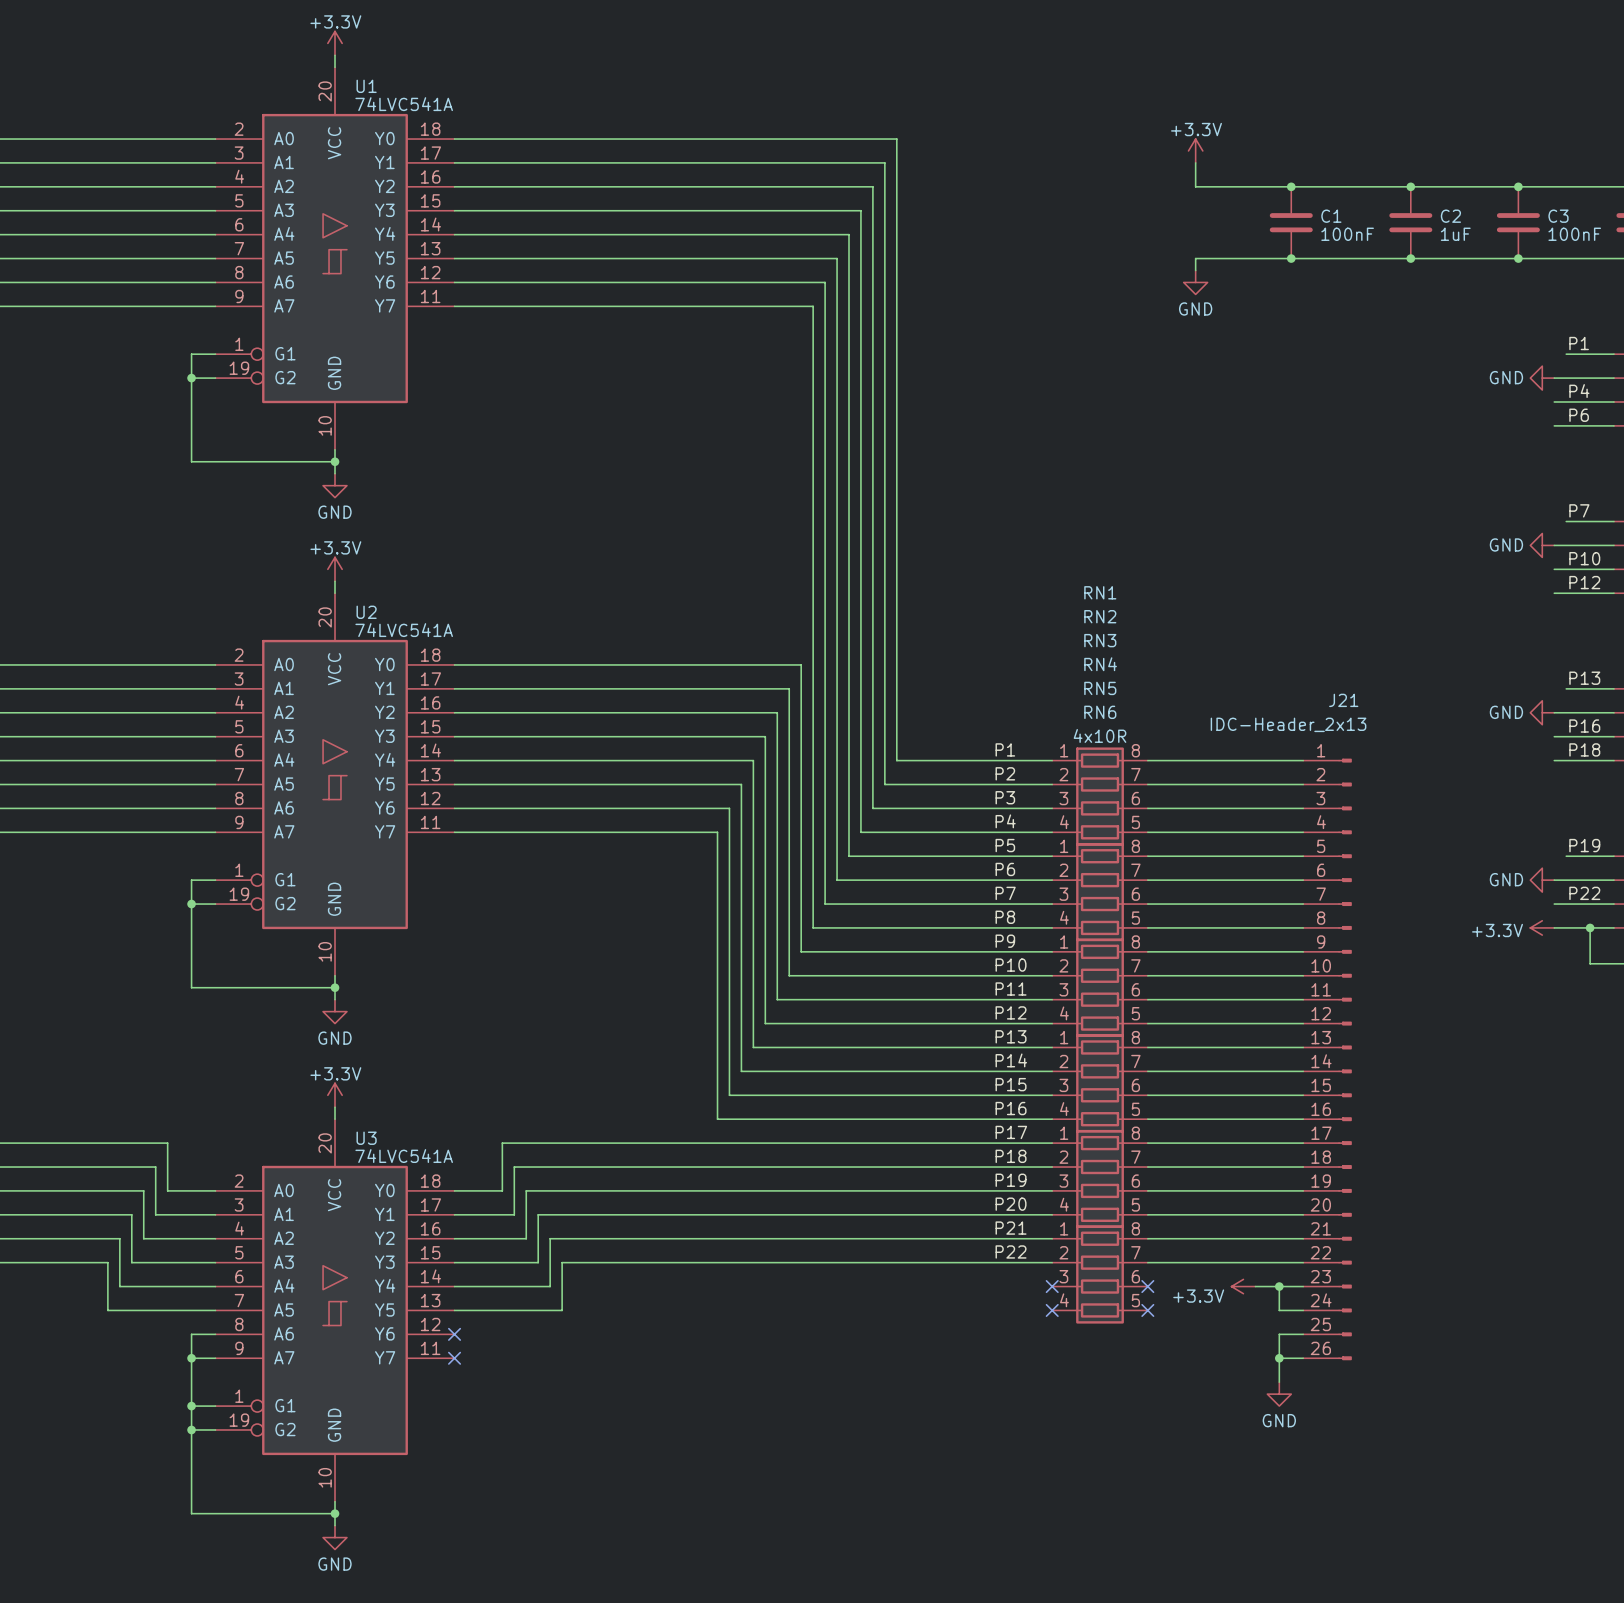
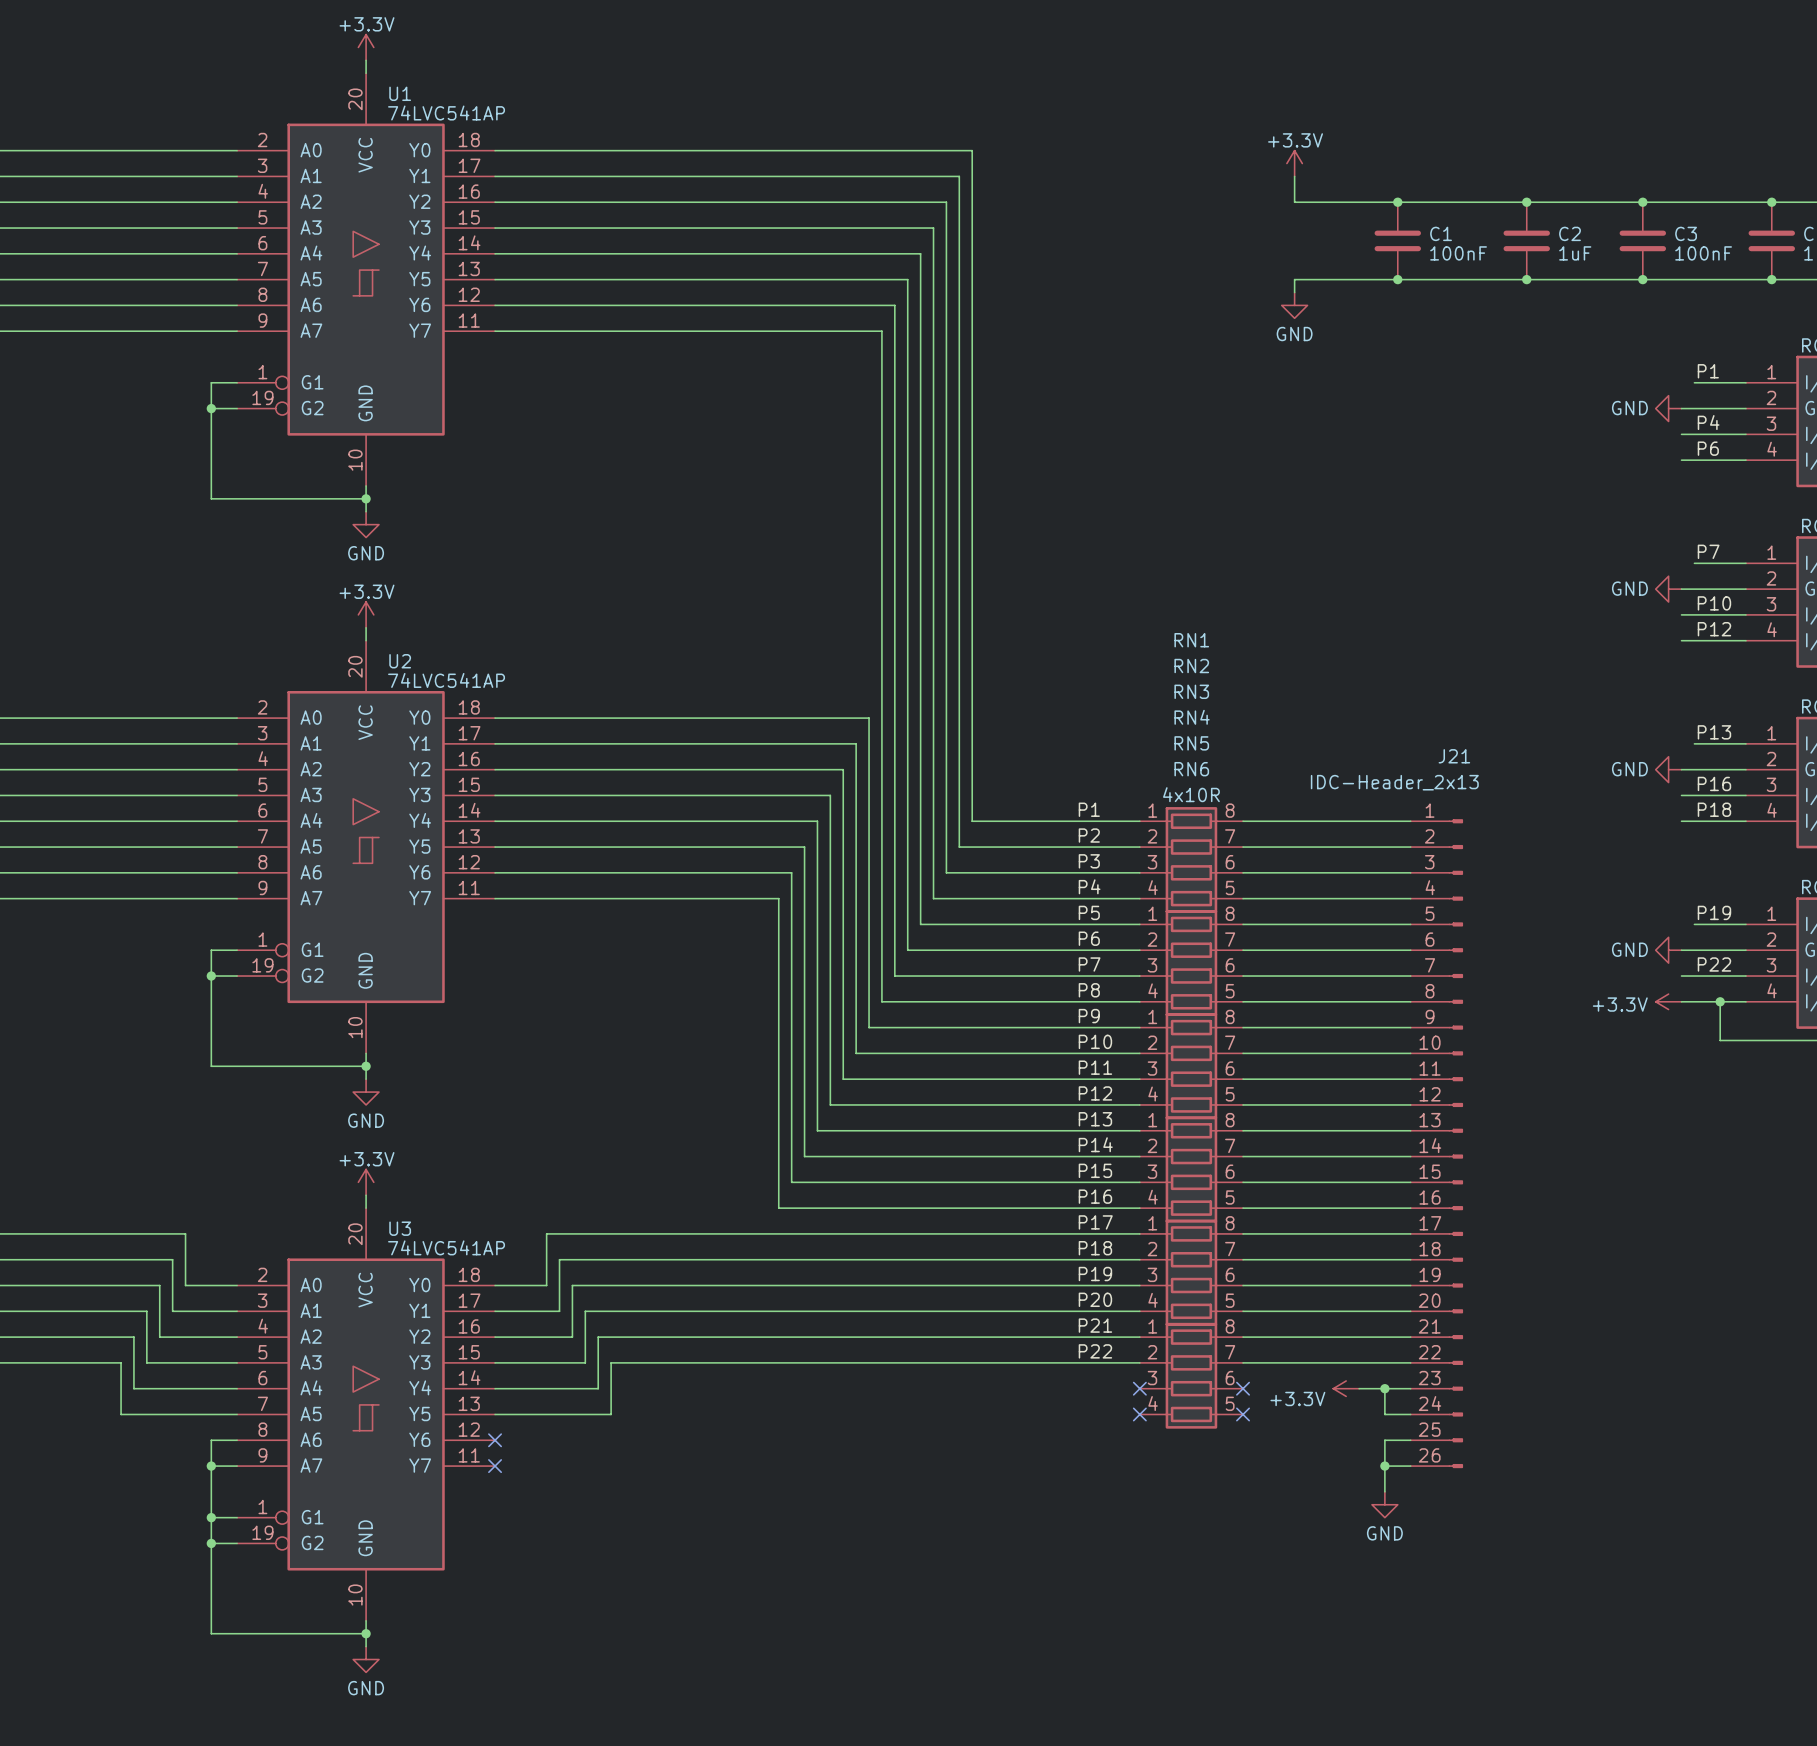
U1 value: 74LVC541A (404, 104) -> 74LVC541AP (446, 113)
U2 value: 74LVC541A (404, 630) -> 74LVC541AP (446, 680)
U3 value: 74LVC541A (404, 1156) -> 74LVC541AP (446, 1247)

